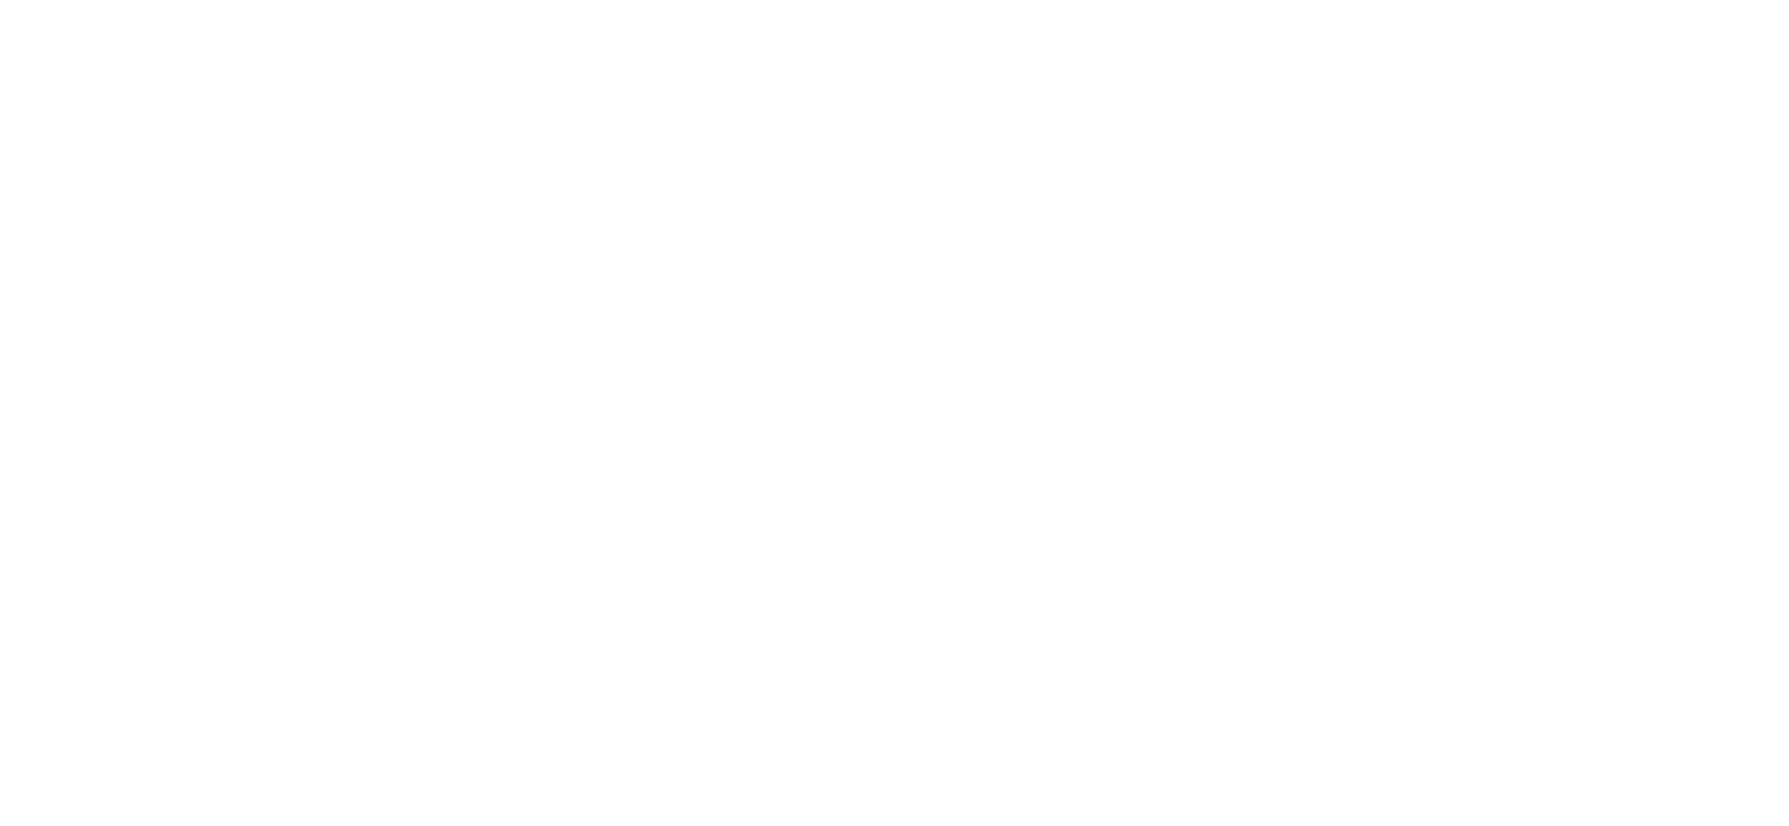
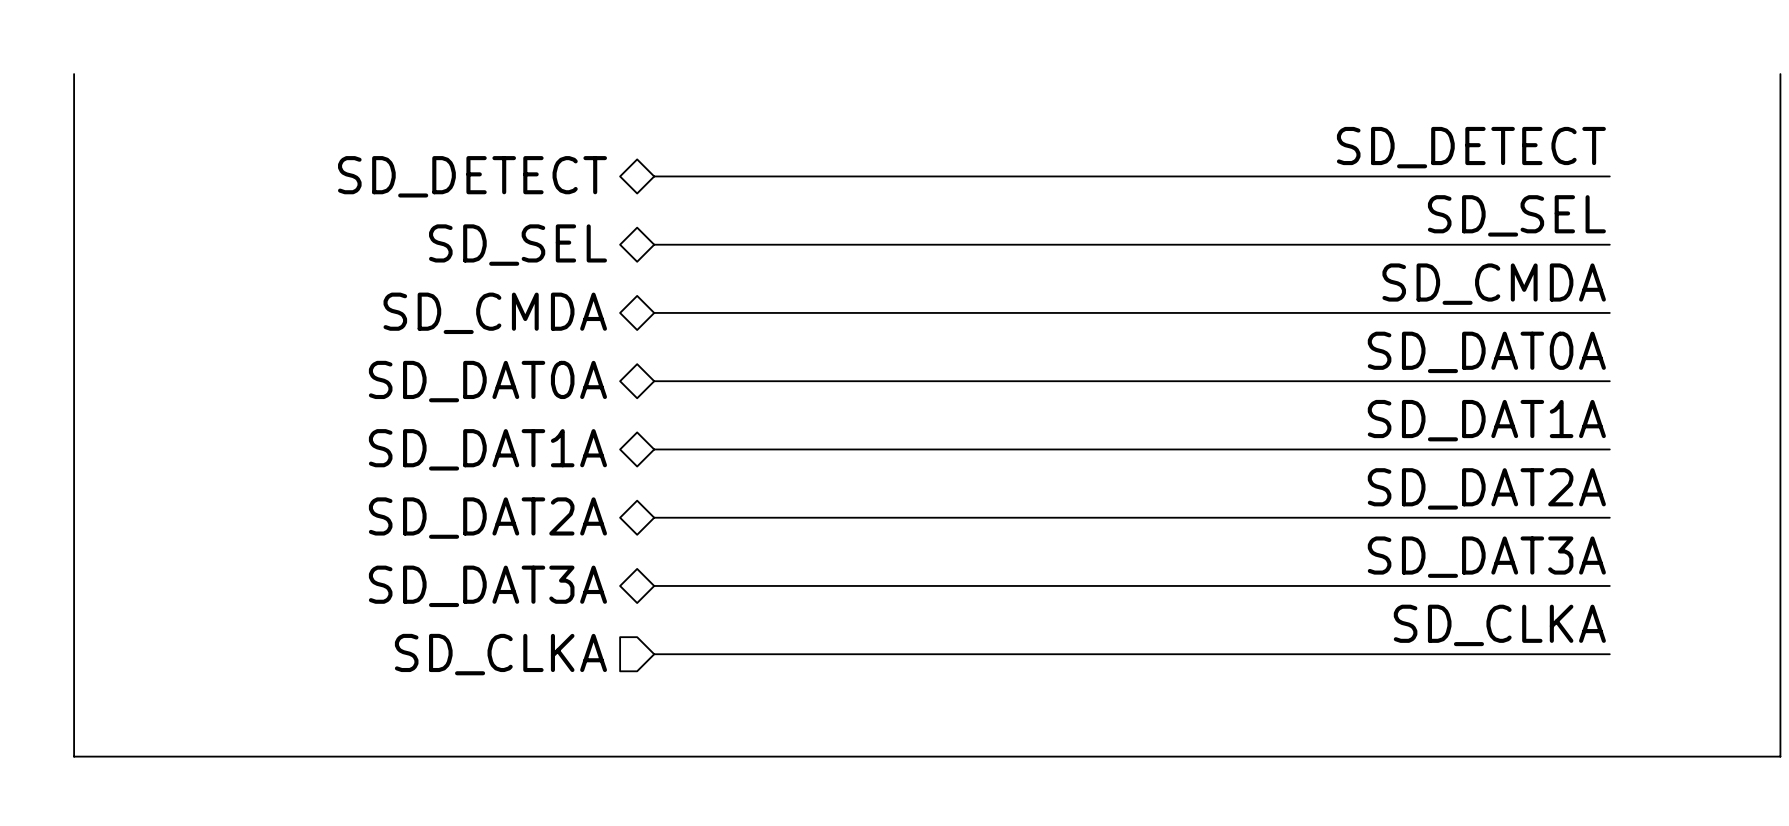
line: none -> (74, 74) (74, 756) (1780, 756) (1780, 74)
label: none -> SD_DETECT (1471, 147)
hierarchical label: none -> SD_DETECT (472, 176)
wire: none -> (654, 176) (1609, 176)
label: none -> SD_SEL (1516, 215)
wire: none -> (654, 244) (1609, 244)
hierarchical label: none -> SD_SEL (518, 245)
label: none -> SD_CMDA (1494, 284)
wire: none -> (654, 312) (1609, 312)
hierarchical label: none -> SD_CMDA (495, 313)
label: none -> SD_DAT0A (1486, 352)
hierarchical label: none -> SD_DAT0A (487, 381)
wire: none -> (654, 381) (1609, 381)
label: none -> SD_DAT1A (1486, 420)
hierarchical label: none -> SD_DAT1A (487, 449)
wire: none -> (654, 449) (1609, 449)
label: none -> SD_DAT2A (1486, 488)
wire: none -> (654, 517) (1609, 517)
hierarchical label: none -> SD_DAT2A (487, 518)
label: none -> SD_DAT3A (1486, 557)
wire: none -> (654, 585) (1609, 585)
hierarchical label: none -> SD_DAT3A (487, 586)
label: none -> SD_CLKA (1499, 625)
hierarchical label: none -> SD_CLKA (500, 654)
wire: none -> (654, 654) (1609, 654)

